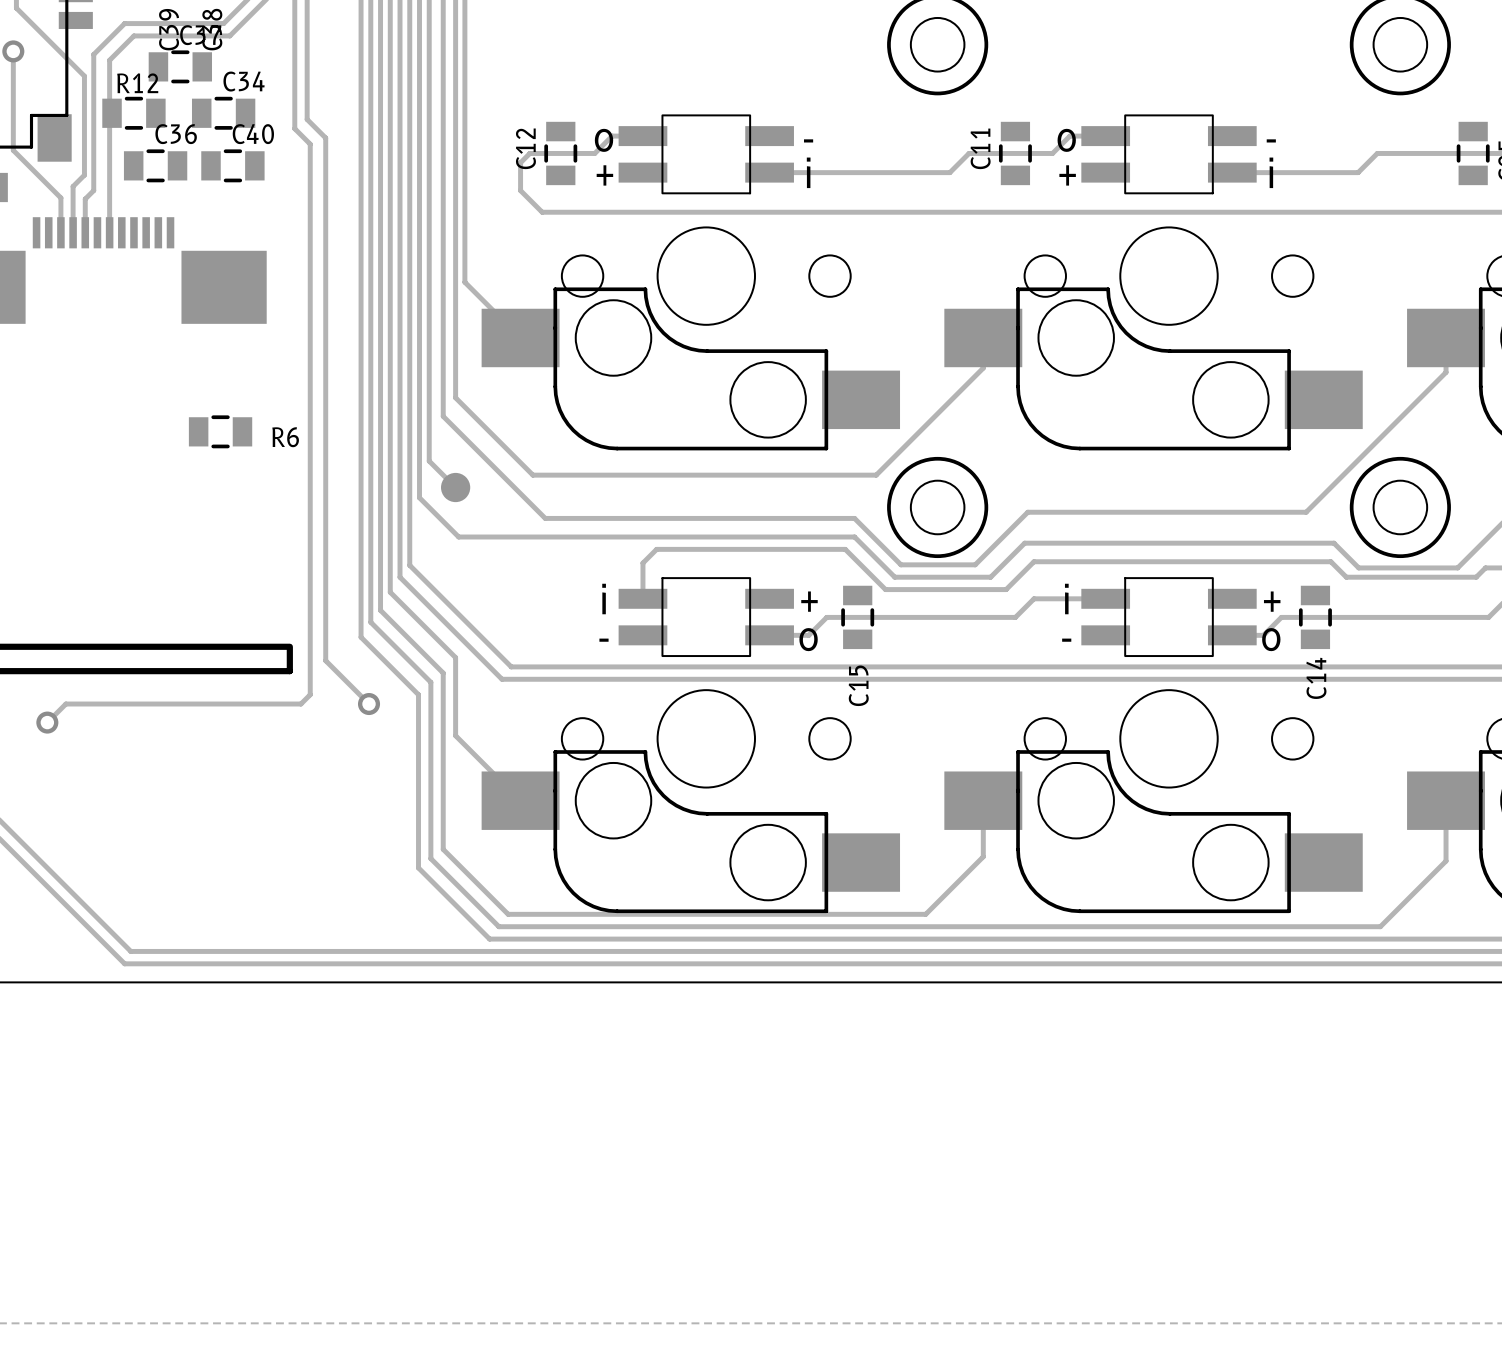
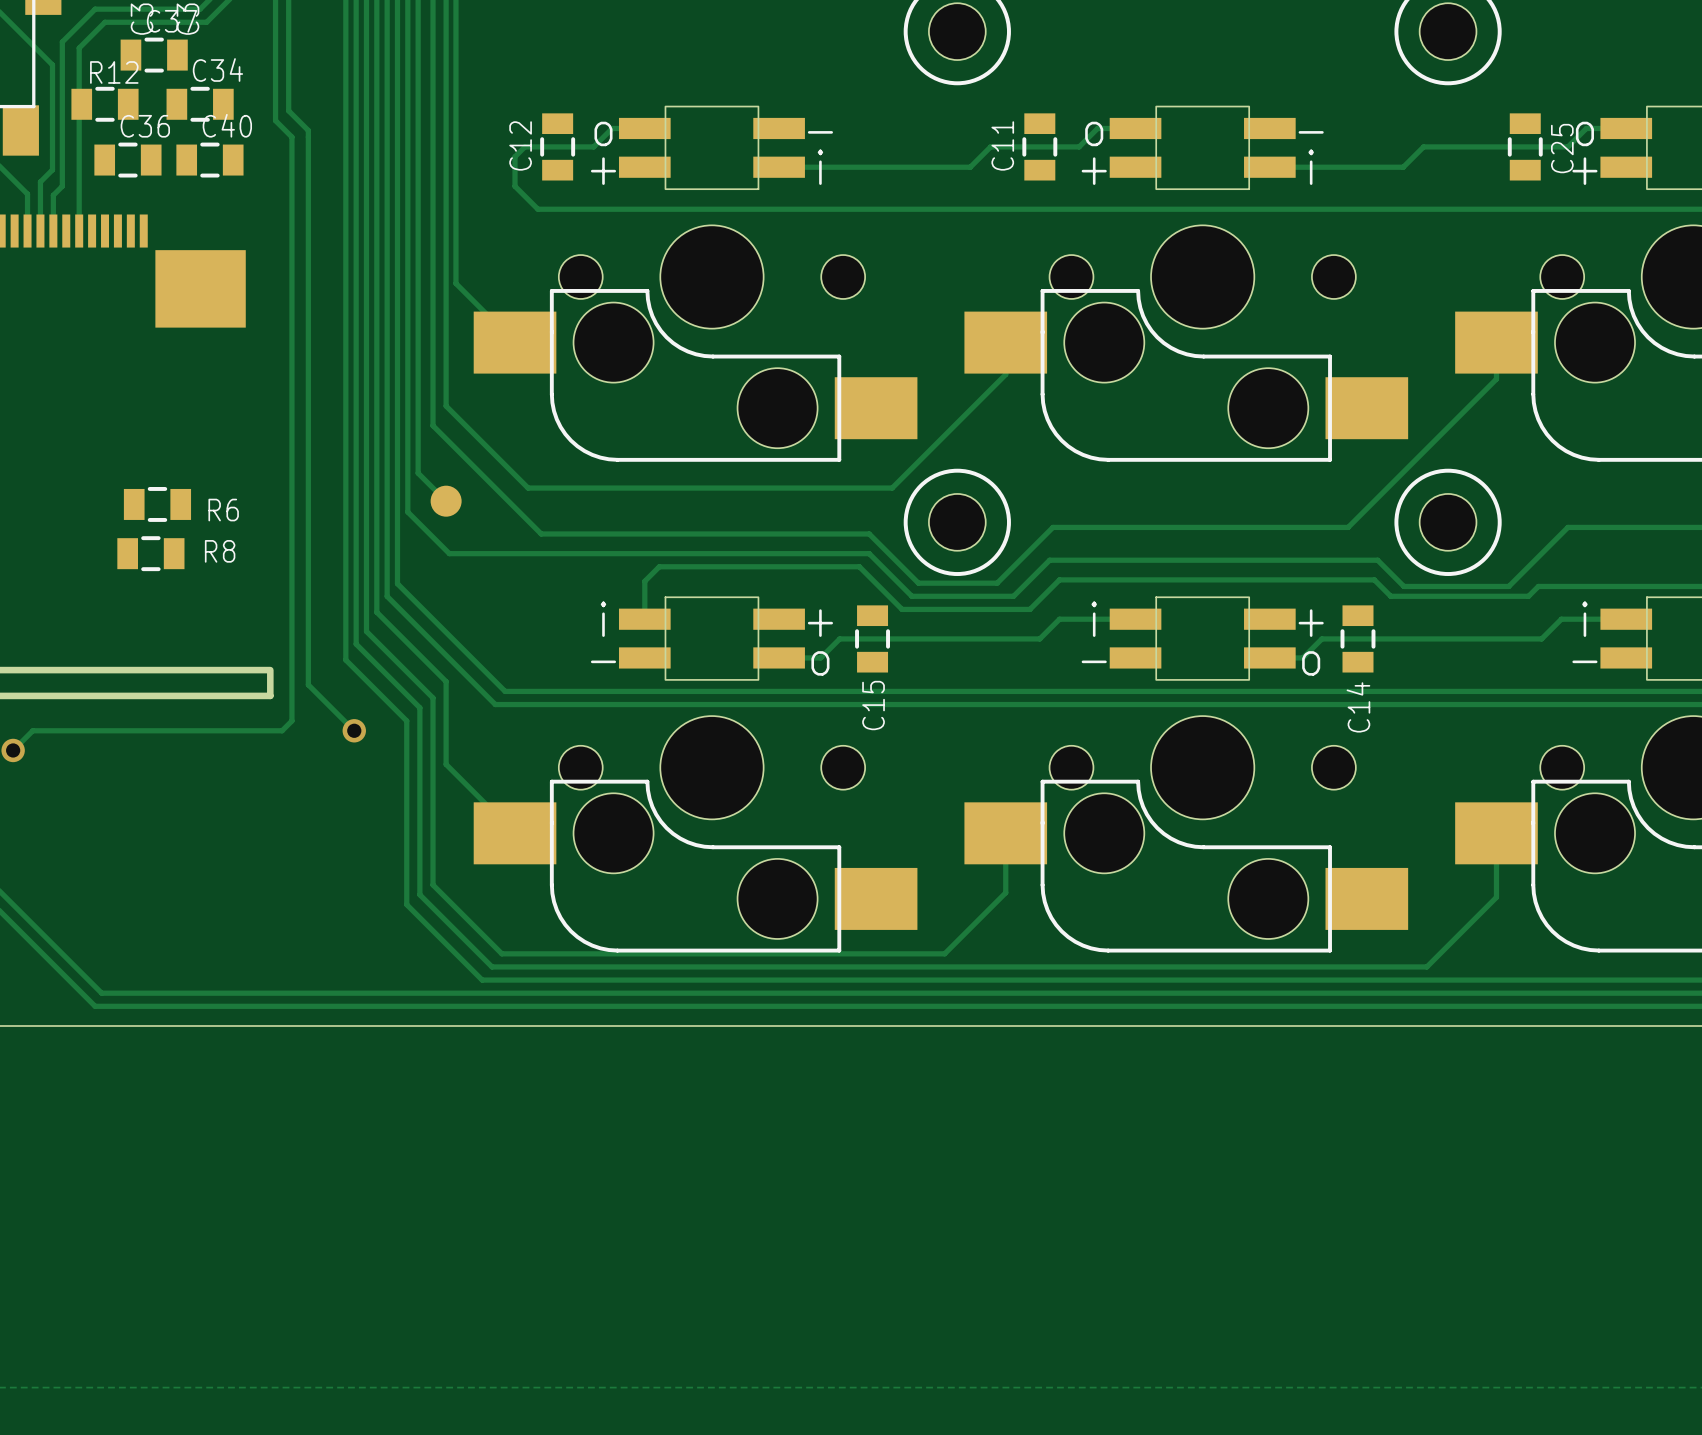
R6 position: (220, 431) -> (157, 504)
R8: none -> (150, 553)

